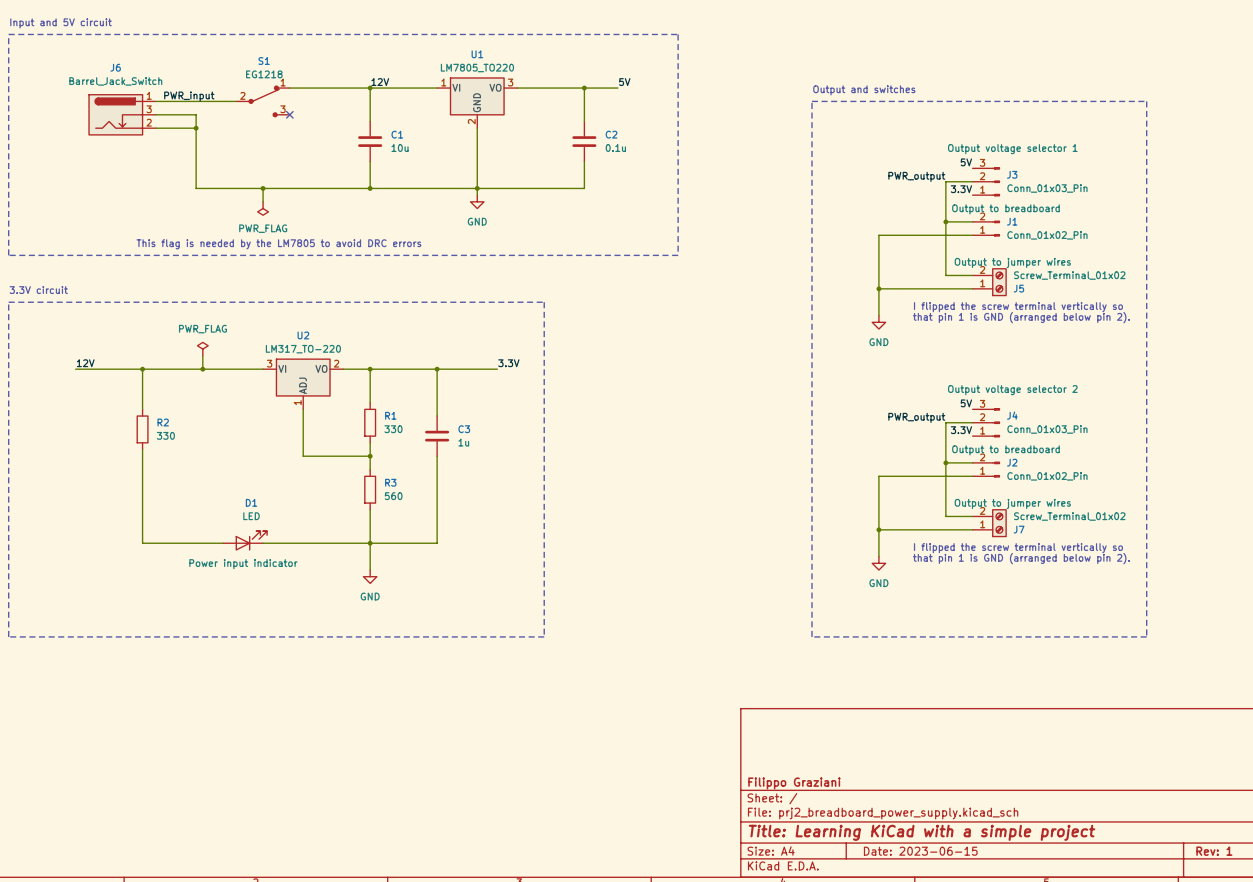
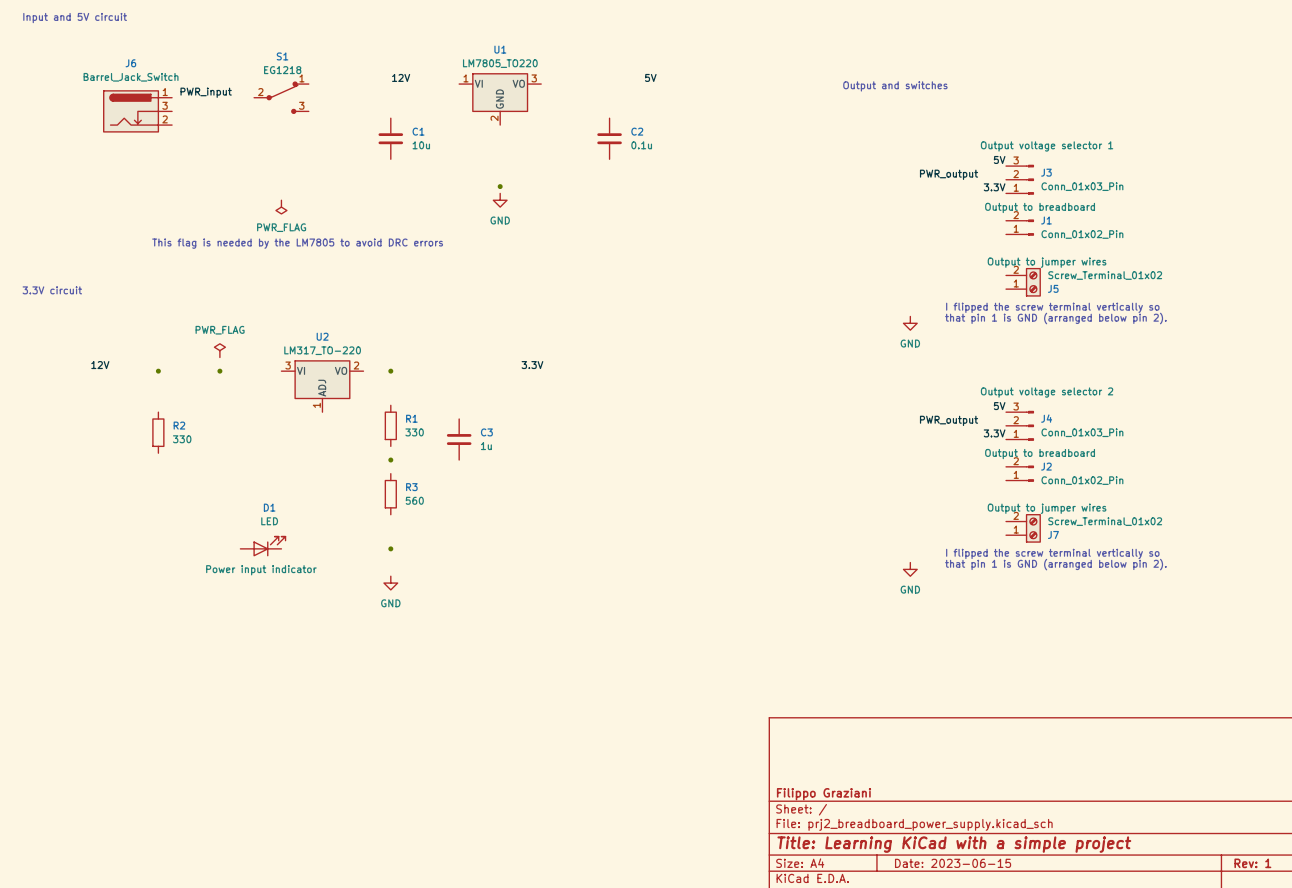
line: (8, 34) (8, 255) (678, 255) (678, 34) (8, 34) -> none
wire: (289, 88) (437, 88) -> none
wire: (370, 88) (370, 121) -> none
junction: (370, 88) -> none
wire: (517, 88) (617, 88) -> none
wire: (584, 88) (584, 121) -> none
junction: (584, 88) -> none
wire: (155, 101) (236, 101) -> none
line: (811, 101) (1146, 101) (1146, 636) (811, 636) (811, 101) -> none
wire: (155, 114) (196, 114) (196, 188) (584, 188) (584, 161) -> none
no-connect mark: (289, 114) -> none
wire: (155, 128) (196, 128) -> none
junction: (196, 128) -> none
wire: (477, 128) (477, 195) -> none
wire: (370, 161) (370, 188) -> none
wire: (972, 181) (945, 181) (945, 275) (972, 275) -> none
wire: (263, 188) (263, 201) -> none
junction: (263, 188) -> none
junction: (370, 188) -> none
wire: (945, 221) (972, 221) -> none
junction: (945, 221) -> none
wire: (972, 235) (878, 235) (878, 315) -> none
wire: (878, 288) (972, 288) -> none
junction: (878, 288) -> none
line: (8, 302) (544, 302) (544, 636) (8, 636) (8, 302) -> none
wire: (202, 355) (202, 369) -> none
wire: (75, 369) (263, 369) -> none
wire: (142, 369) (142, 409) -> none
wire: (343, 369) (497, 369) -> none
wire: (370, 369) (370, 402) -> none
wire: (437, 369) (437, 416) -> none
junction: (437, 369) -> none
wire: (303, 409) (303, 456) (370, 456) -> none
wire: (972, 422) (945, 422) (945, 516) (972, 516) -> none
wire: (370, 442) (370, 469) -> none
wire: (142, 449) (142, 543) (222, 543) -> none
wire: (437, 456) (437, 543) (263, 543) -> none
wire: (945, 462) (972, 462) -> none
junction: (945, 462) -> none
wire: (972, 476) (878, 476) (878, 556) -> none
wire: (370, 509) (370, 570) -> none
wire: (878, 529) (972, 529) -> none
junction: (878, 529) -> none

